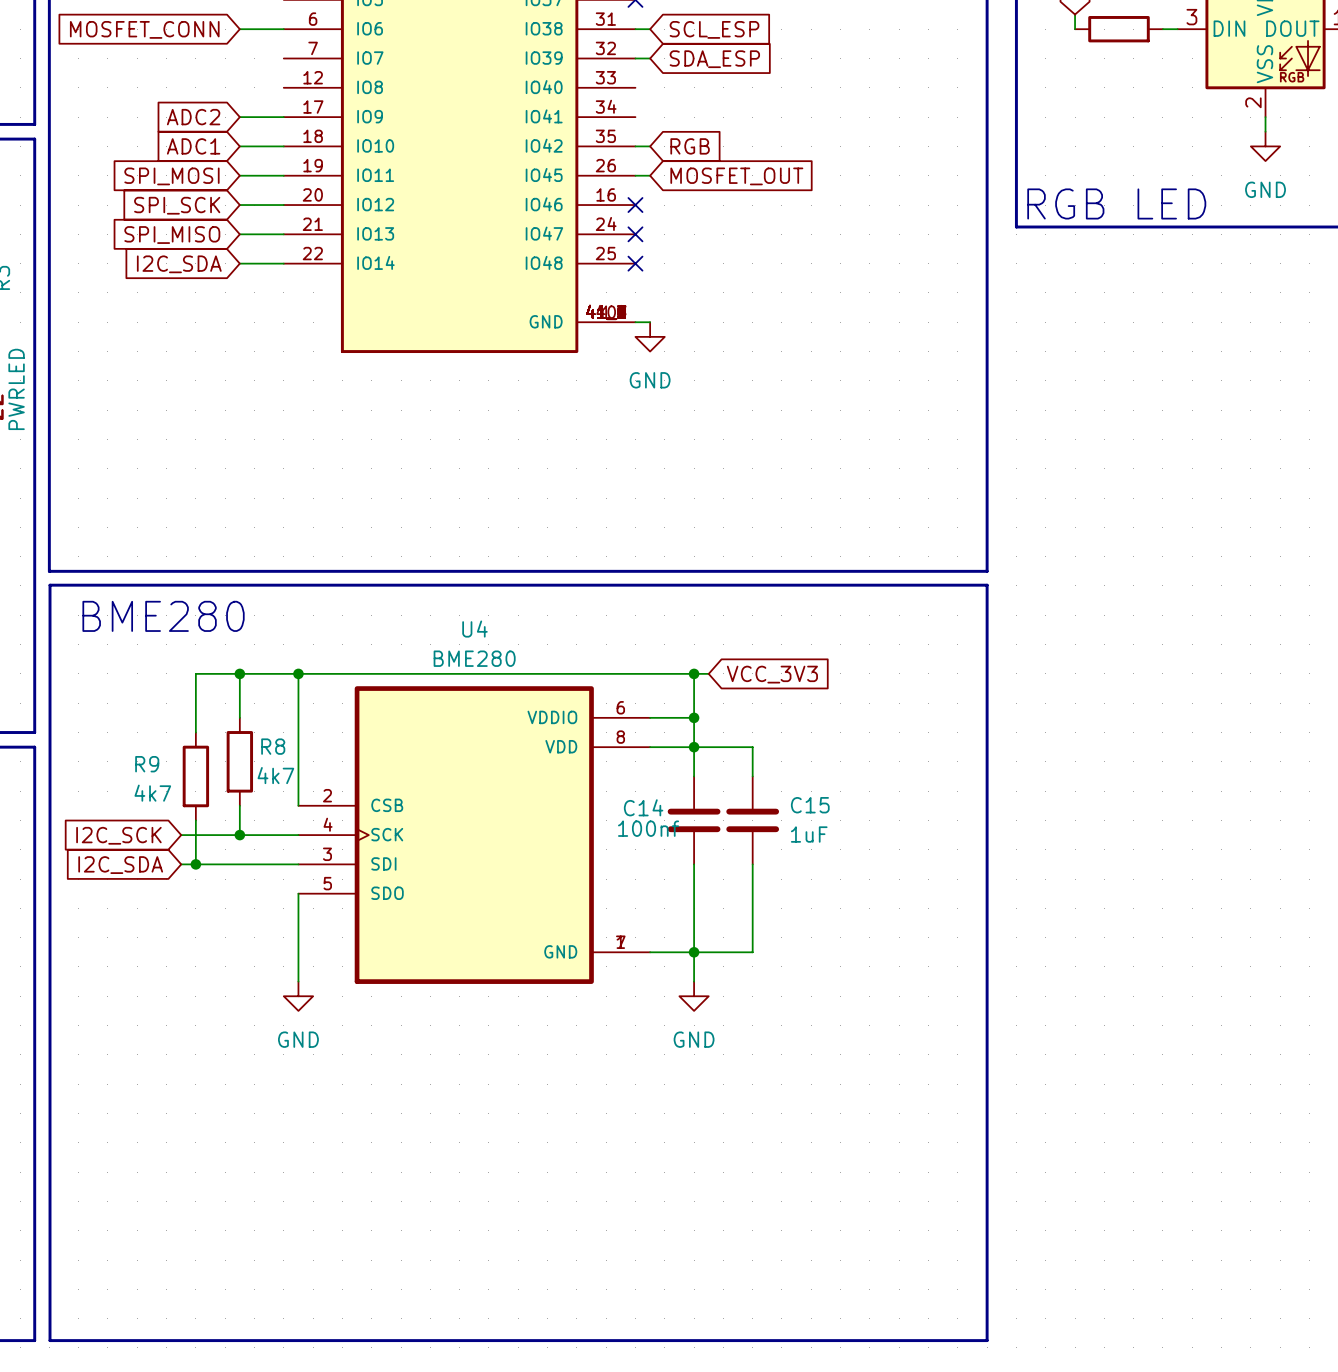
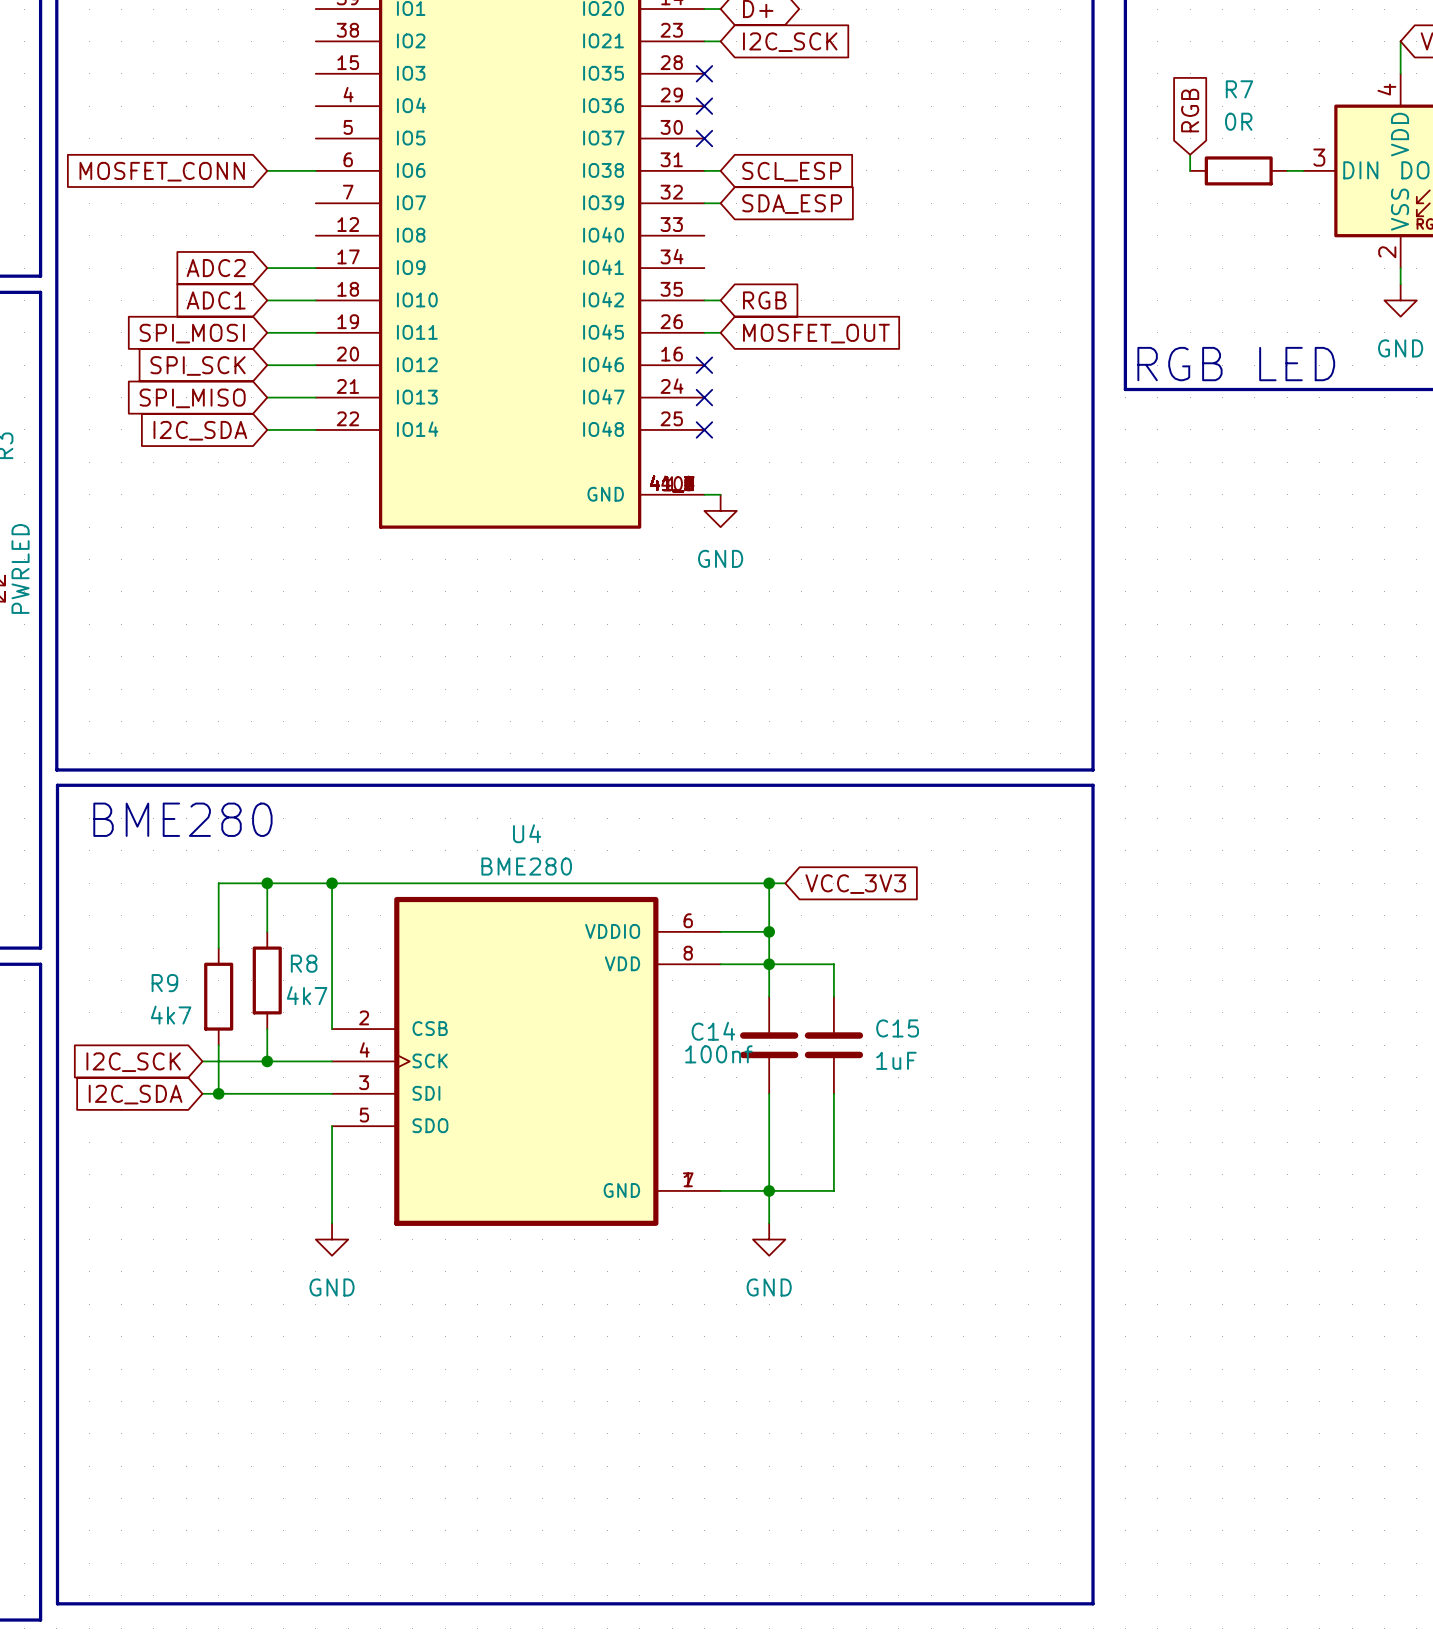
line: (50, 1325) (50, 1340) (987, 1340) (987, 1325) -> (57, 1603) (1093, 1603)

